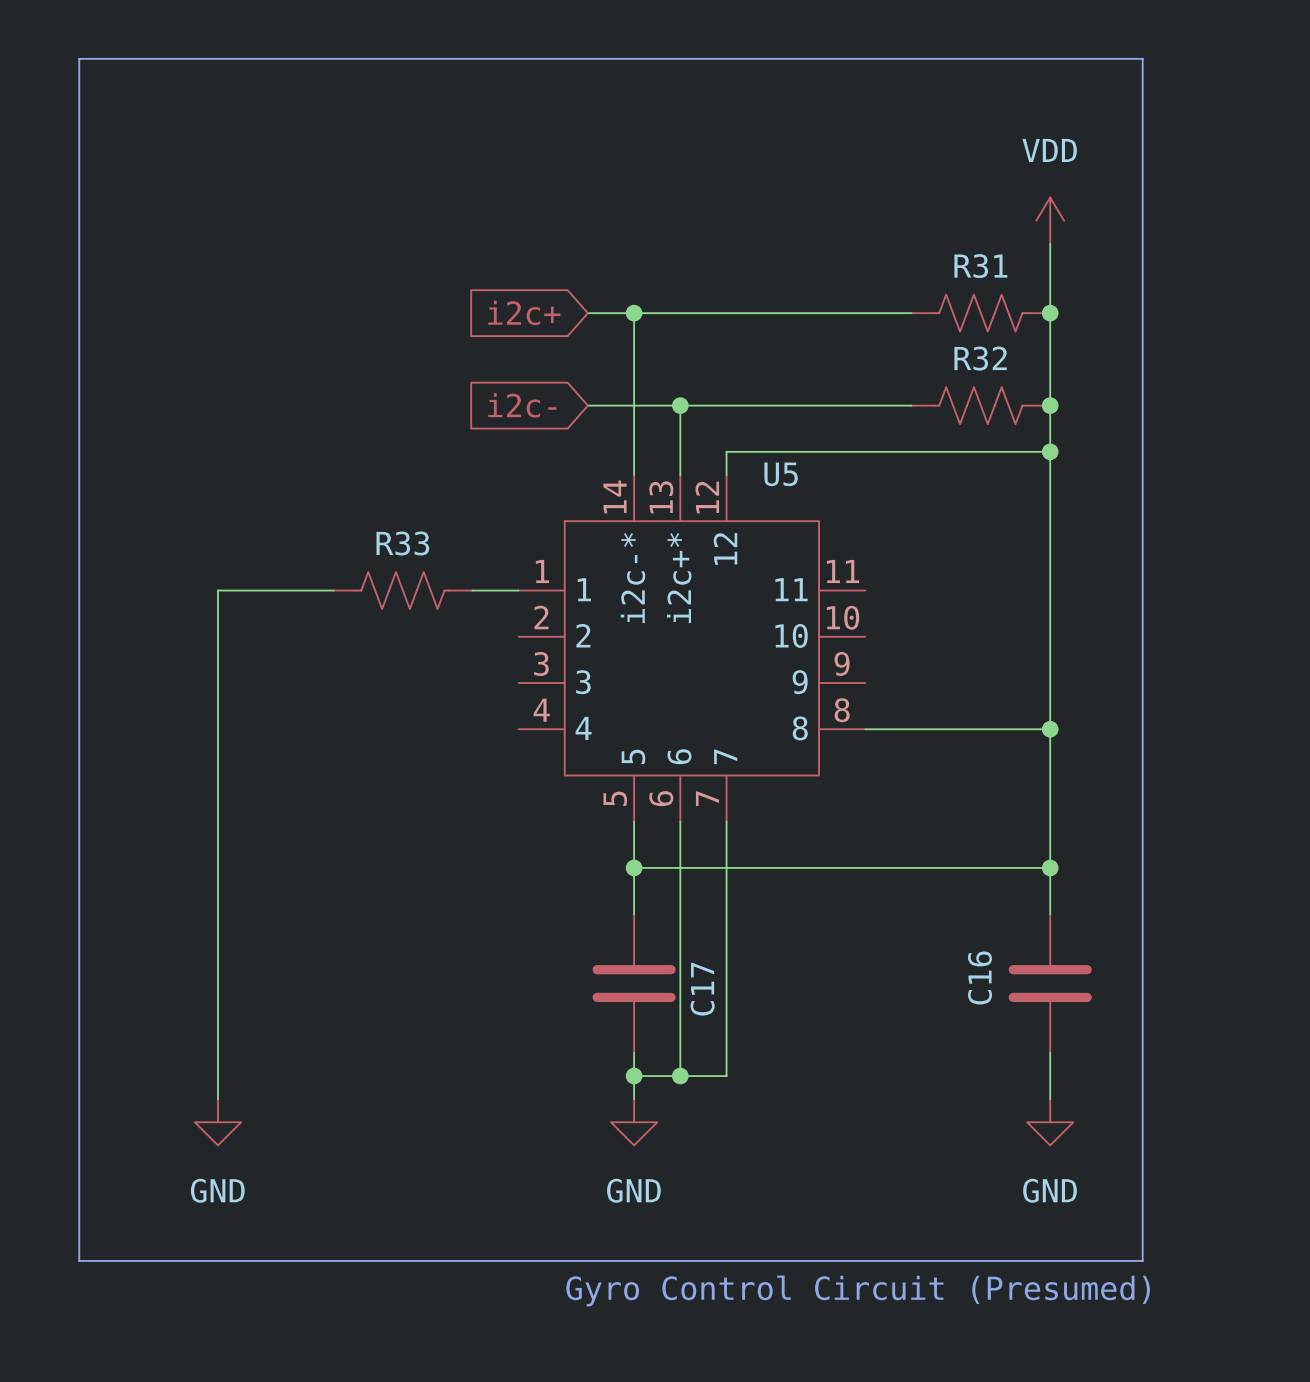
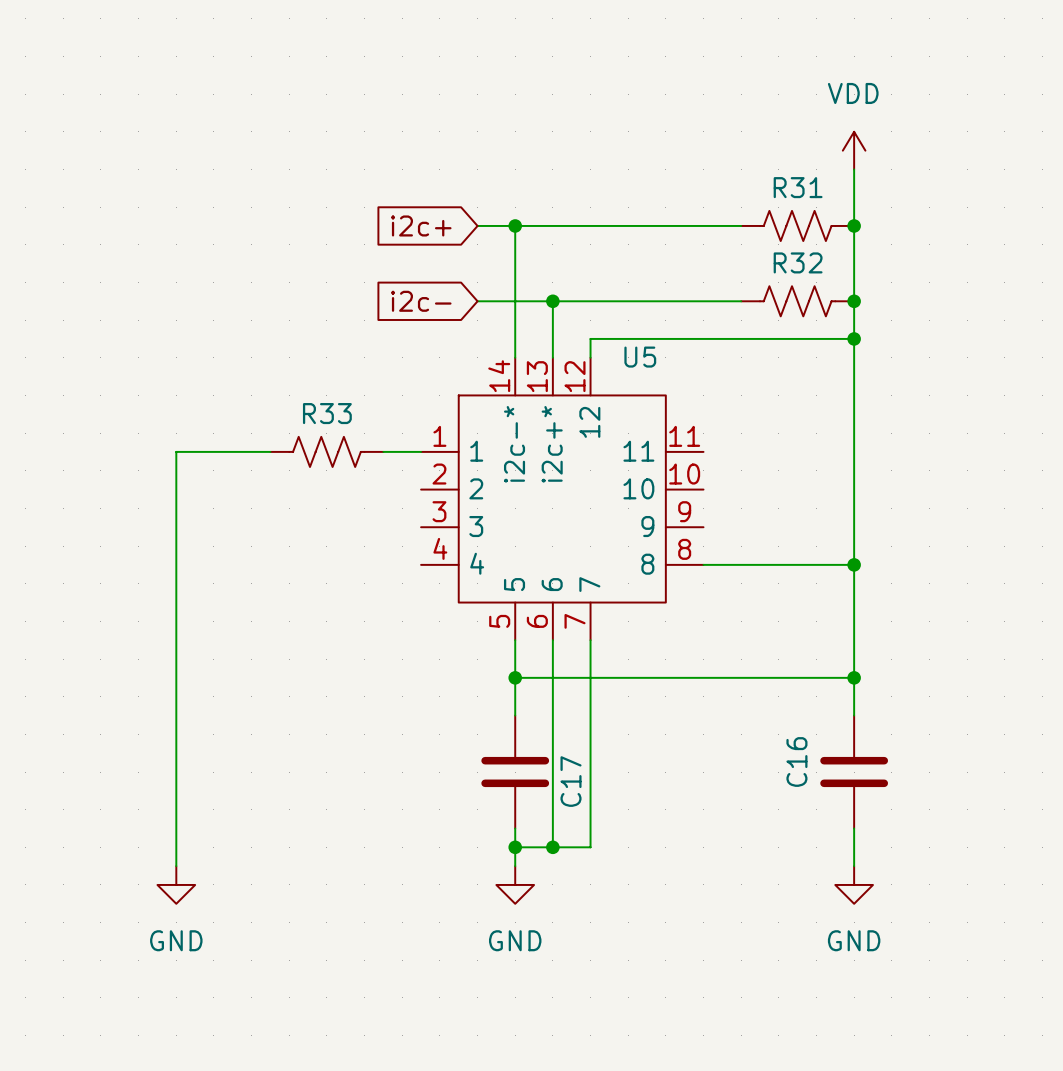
line: (79, 58) (1142, 58) (1142, 1260) (79, 1260) (79, 58) -> none
text: Gyro Control Circuit (Presumed) (858, 1290) -> none

